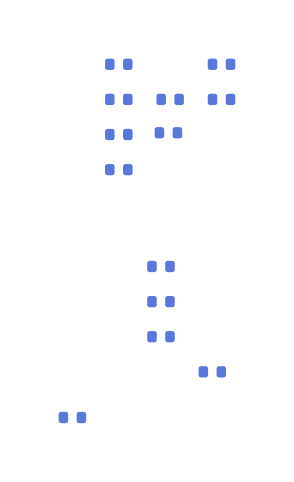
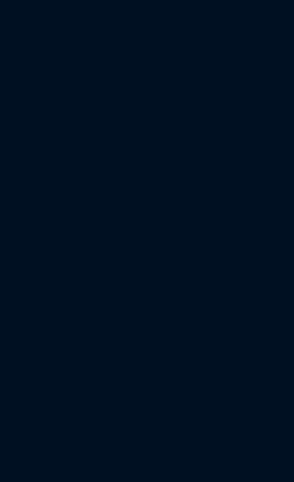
part: (118, 64) -> none
part: (221, 64) -> none
part: (118, 99) -> none
part: (170, 99) -> none
part: (221, 99) -> none
part: (168, 132) -> none
part: (118, 134) -> none
part: (118, 169) -> none
part: (160, 266) -> none
part: (160, 301) -> none
part: (160, 336) -> none
part: (212, 371) -> none
part: (72, 417) -> none

